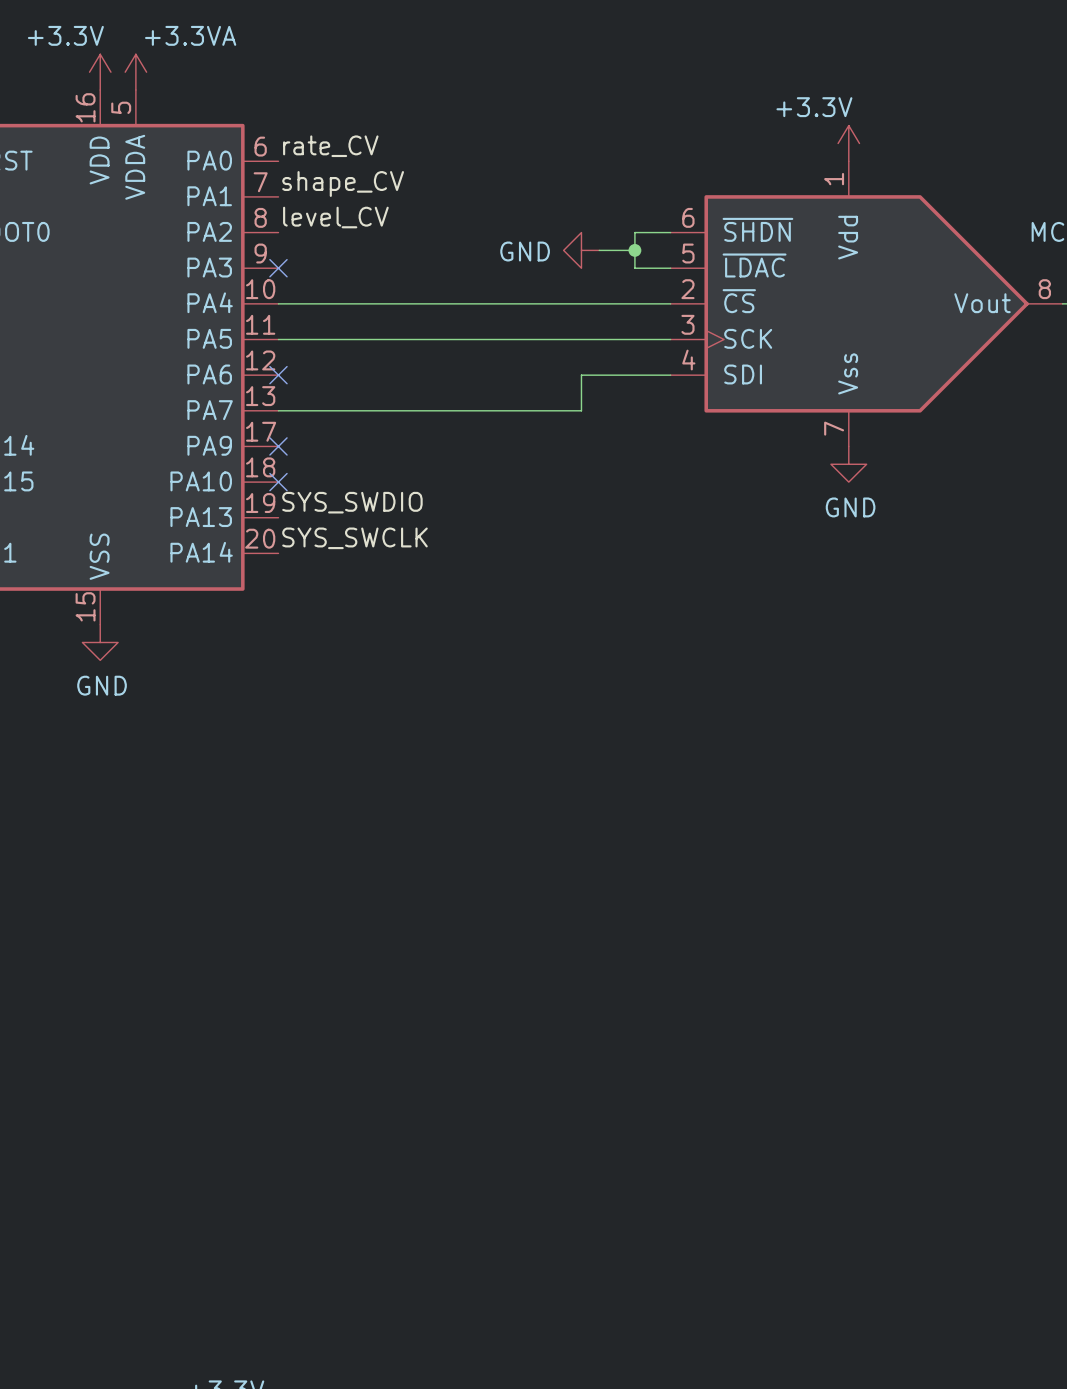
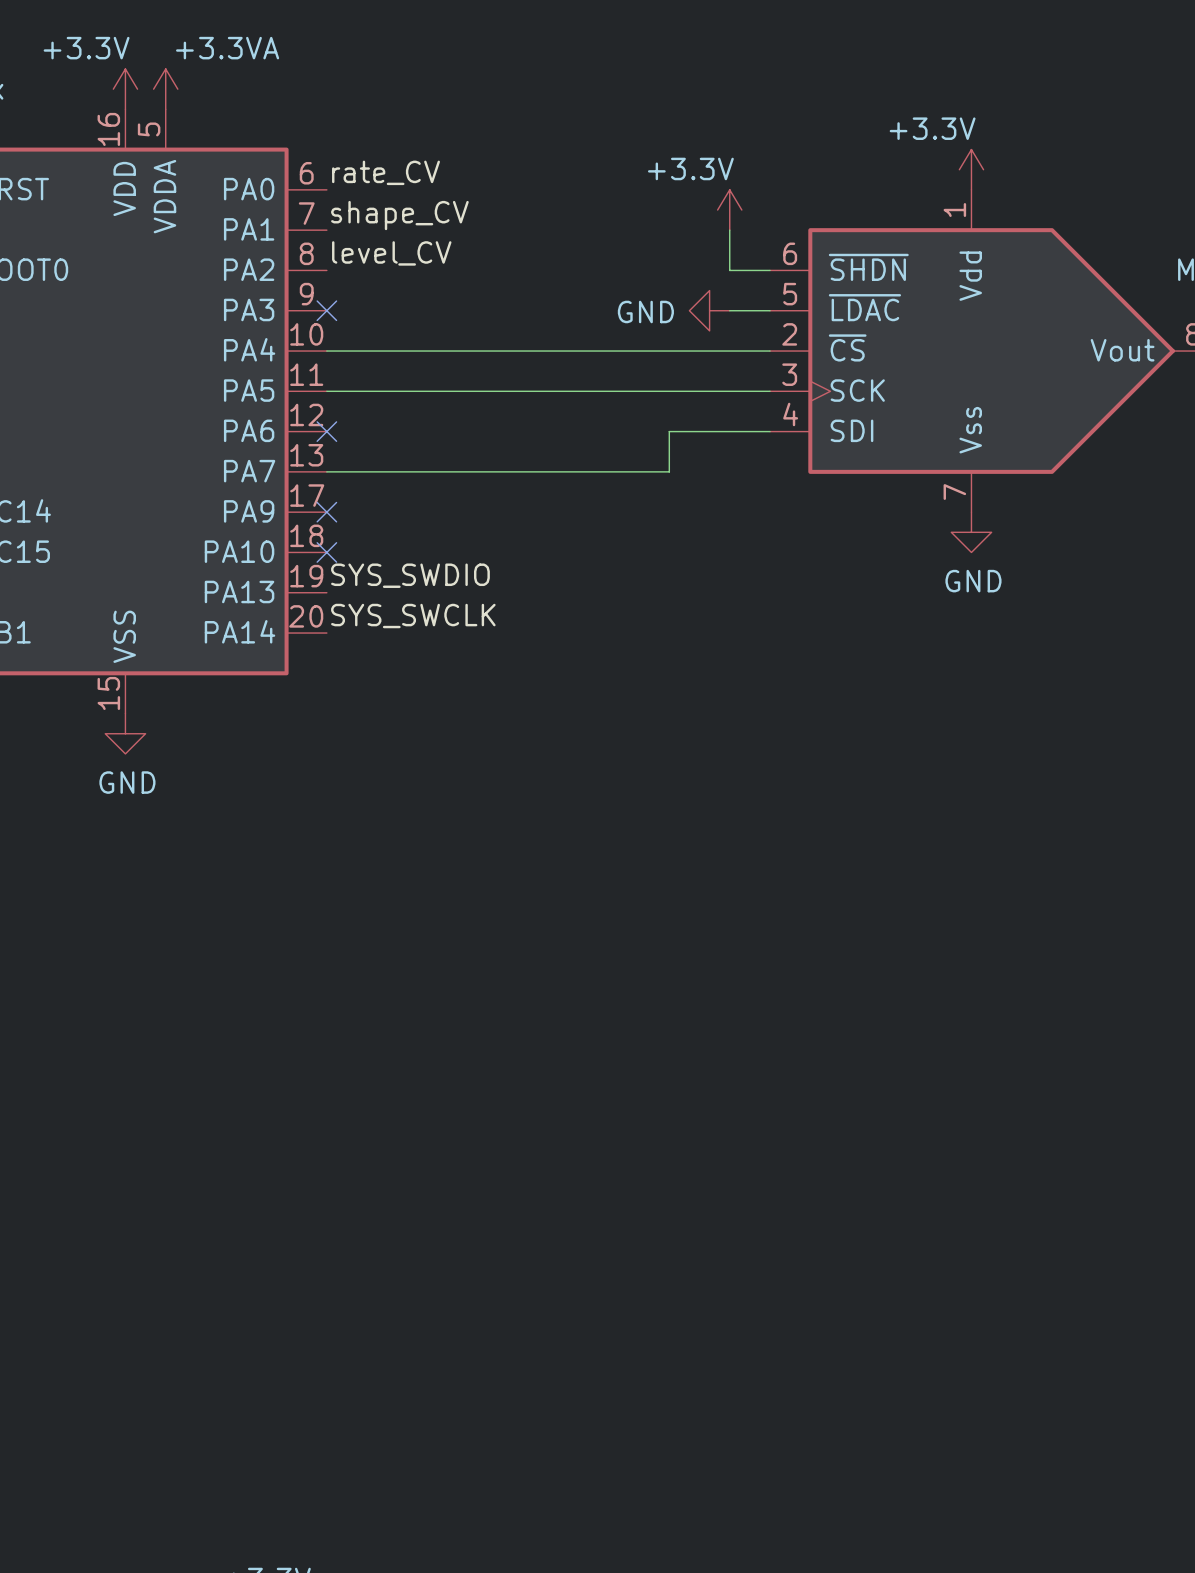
power symbol: none -> +3.3V (729, 210)
wire: (634, 232) (634, 268) -> (729, 270) (729, 230)
power symbol position: GND (581, 250) -> GND (709, 310)
wire: (599, 250) (634, 250) -> none
junction: (634, 250) -> none

